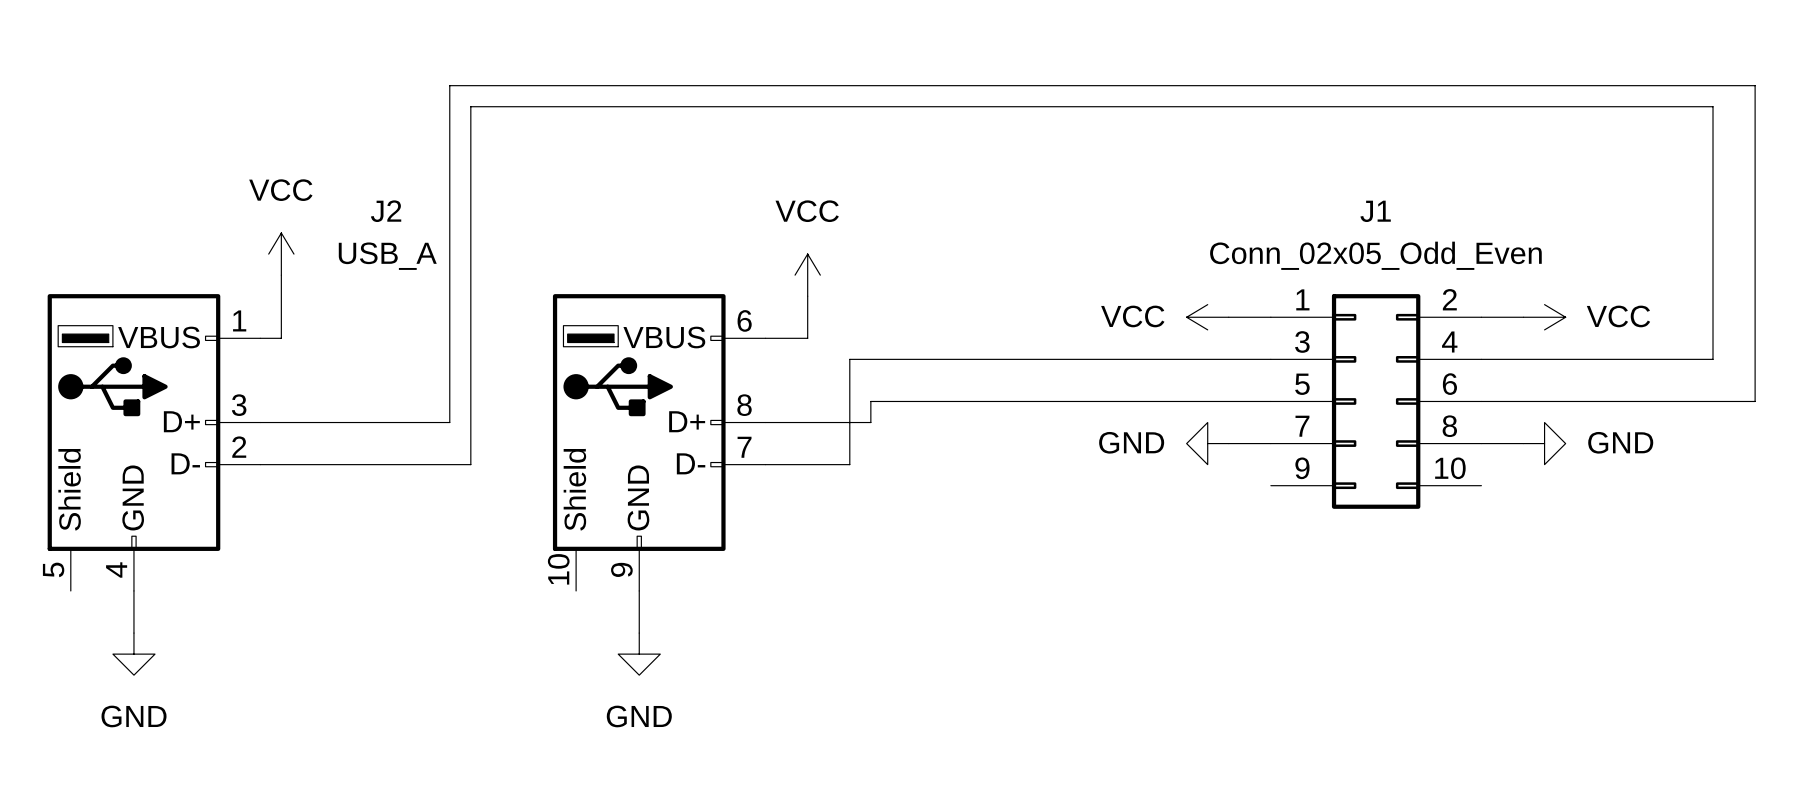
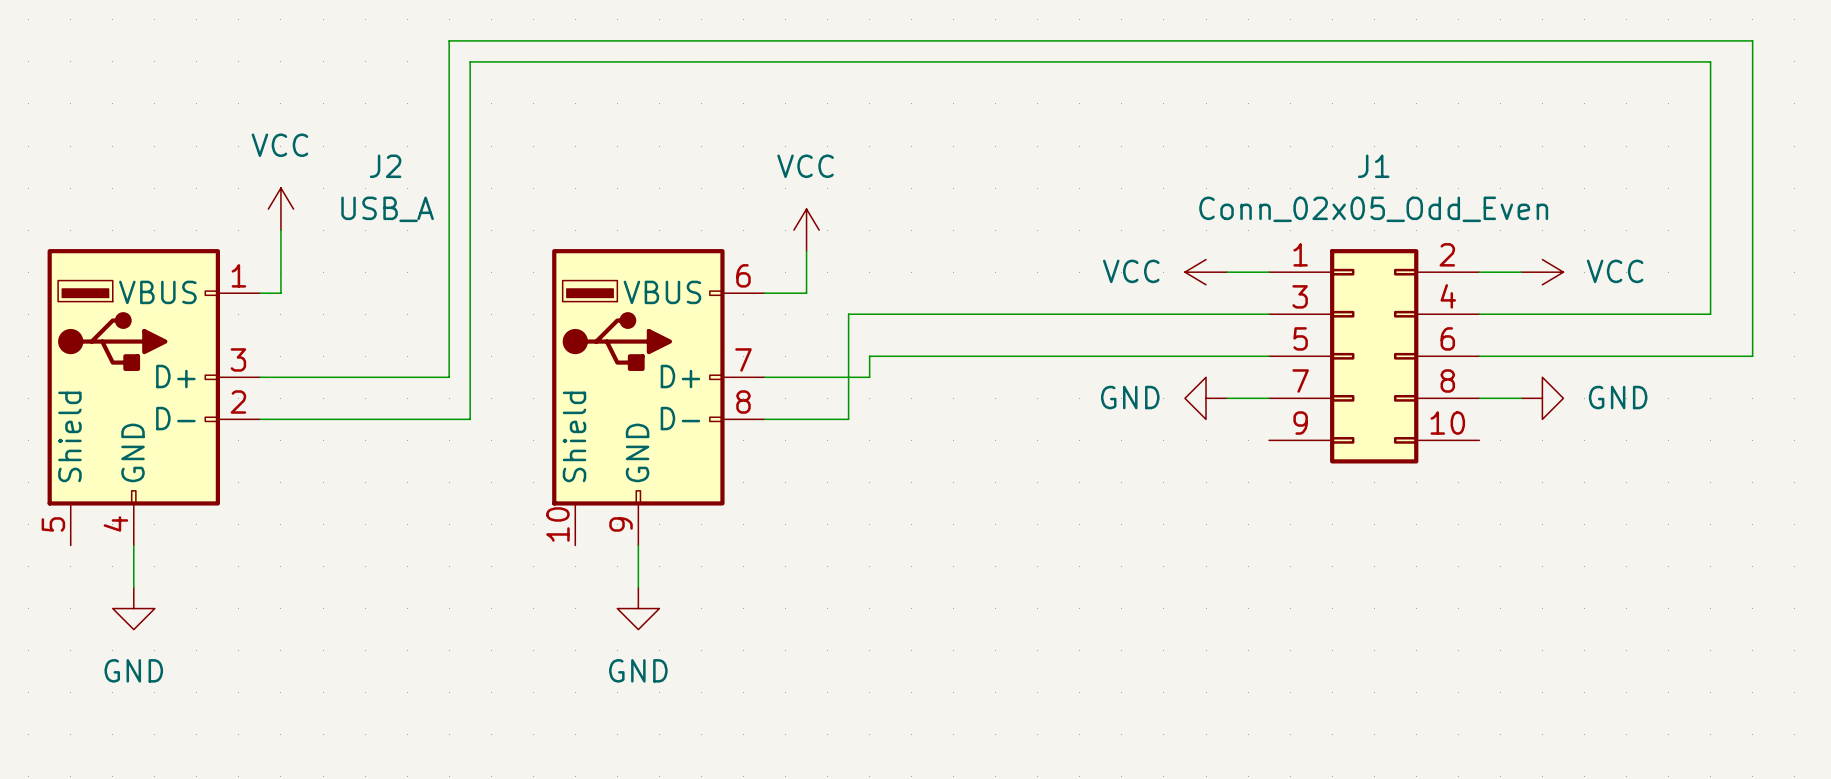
J2 pin number: 8 (744, 405) -> 7 (743, 359)
J2 pin number: 7 (744, 447) -> 8 (743, 402)

